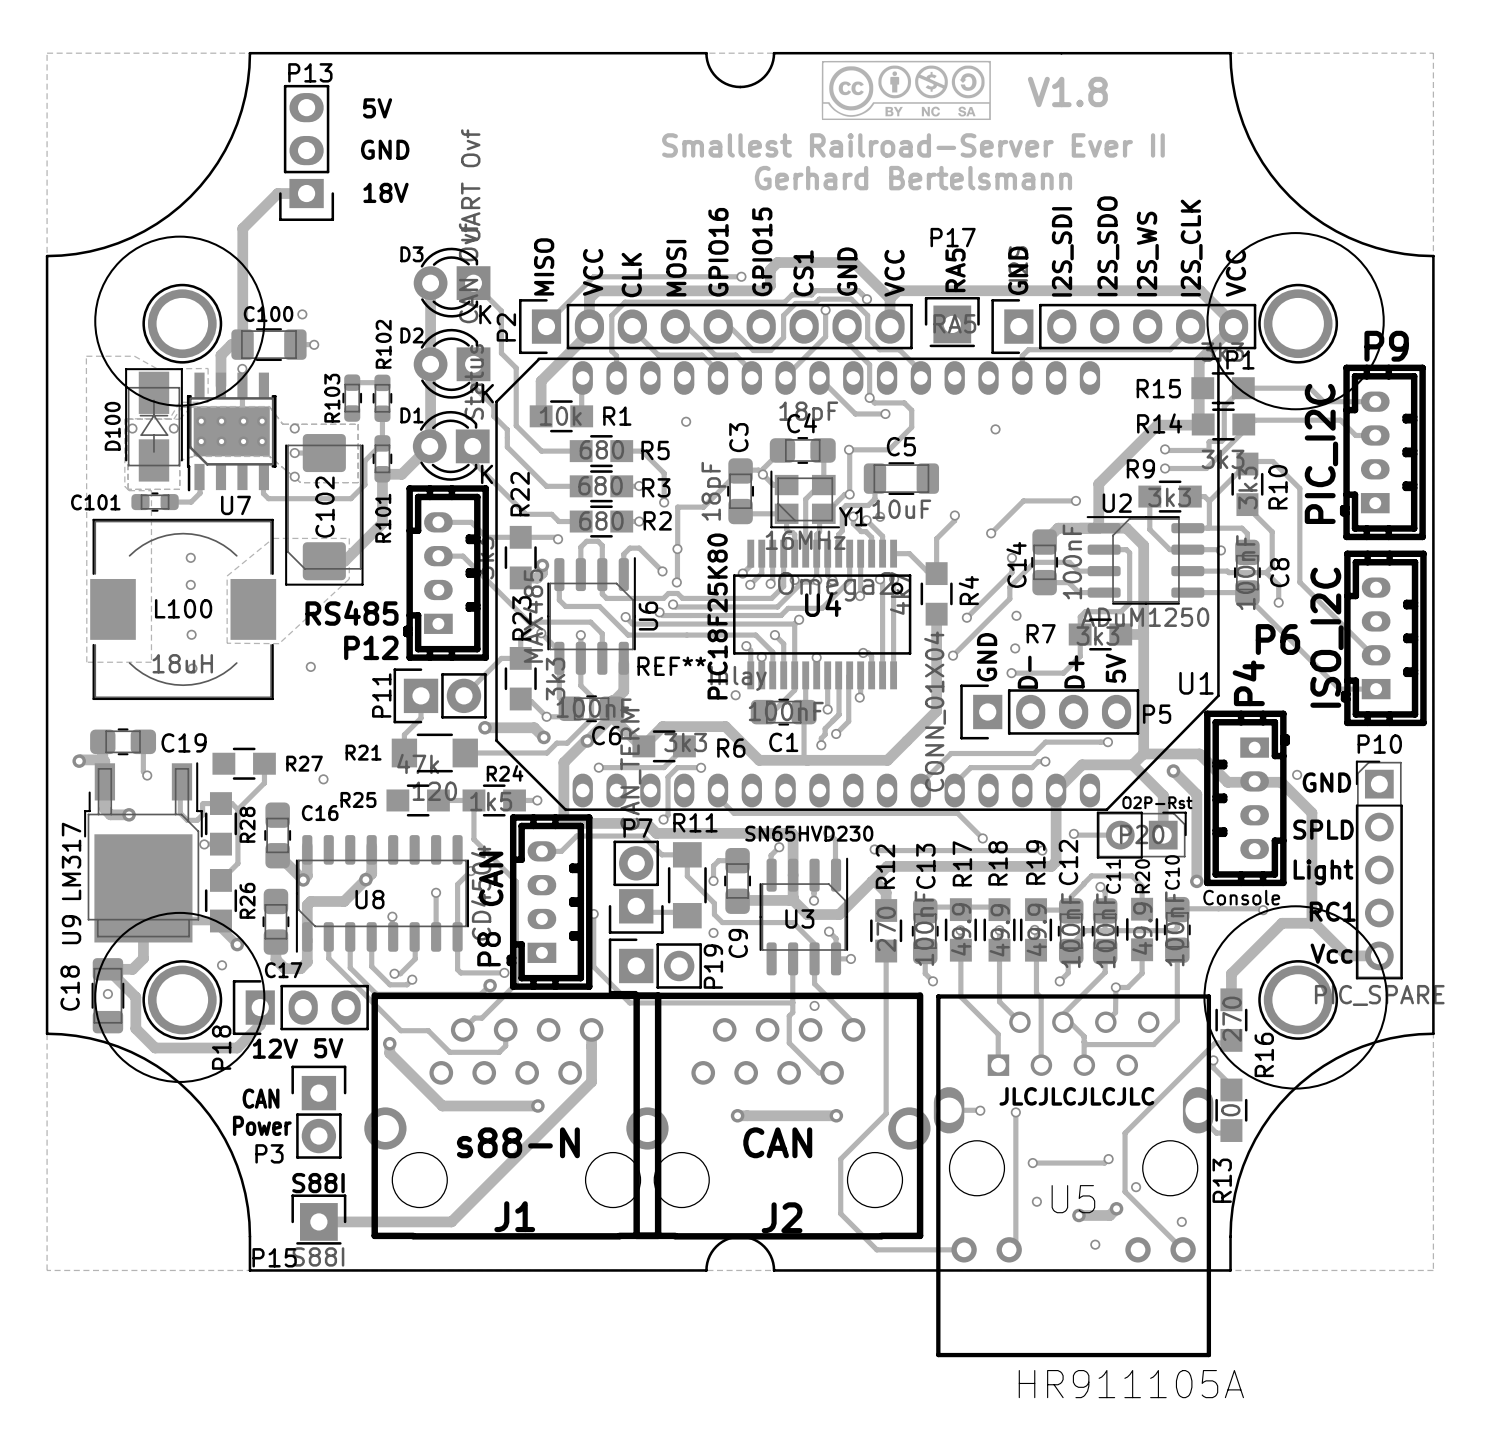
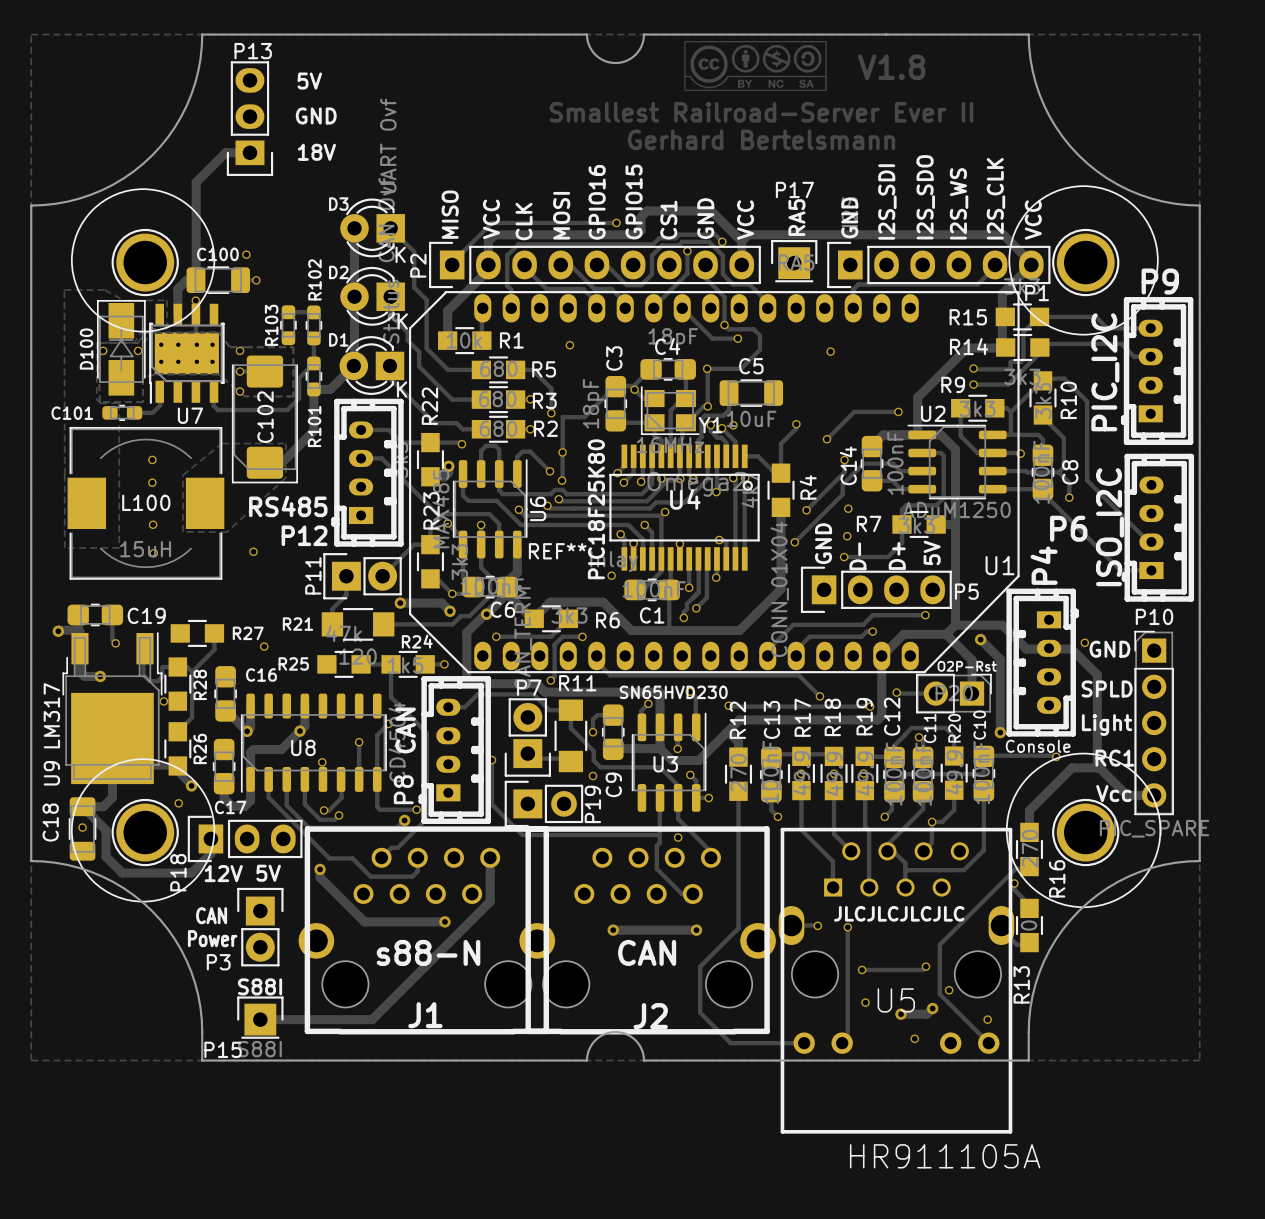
L100 value: 18uH (182, 663) -> 15uH (145, 549)

